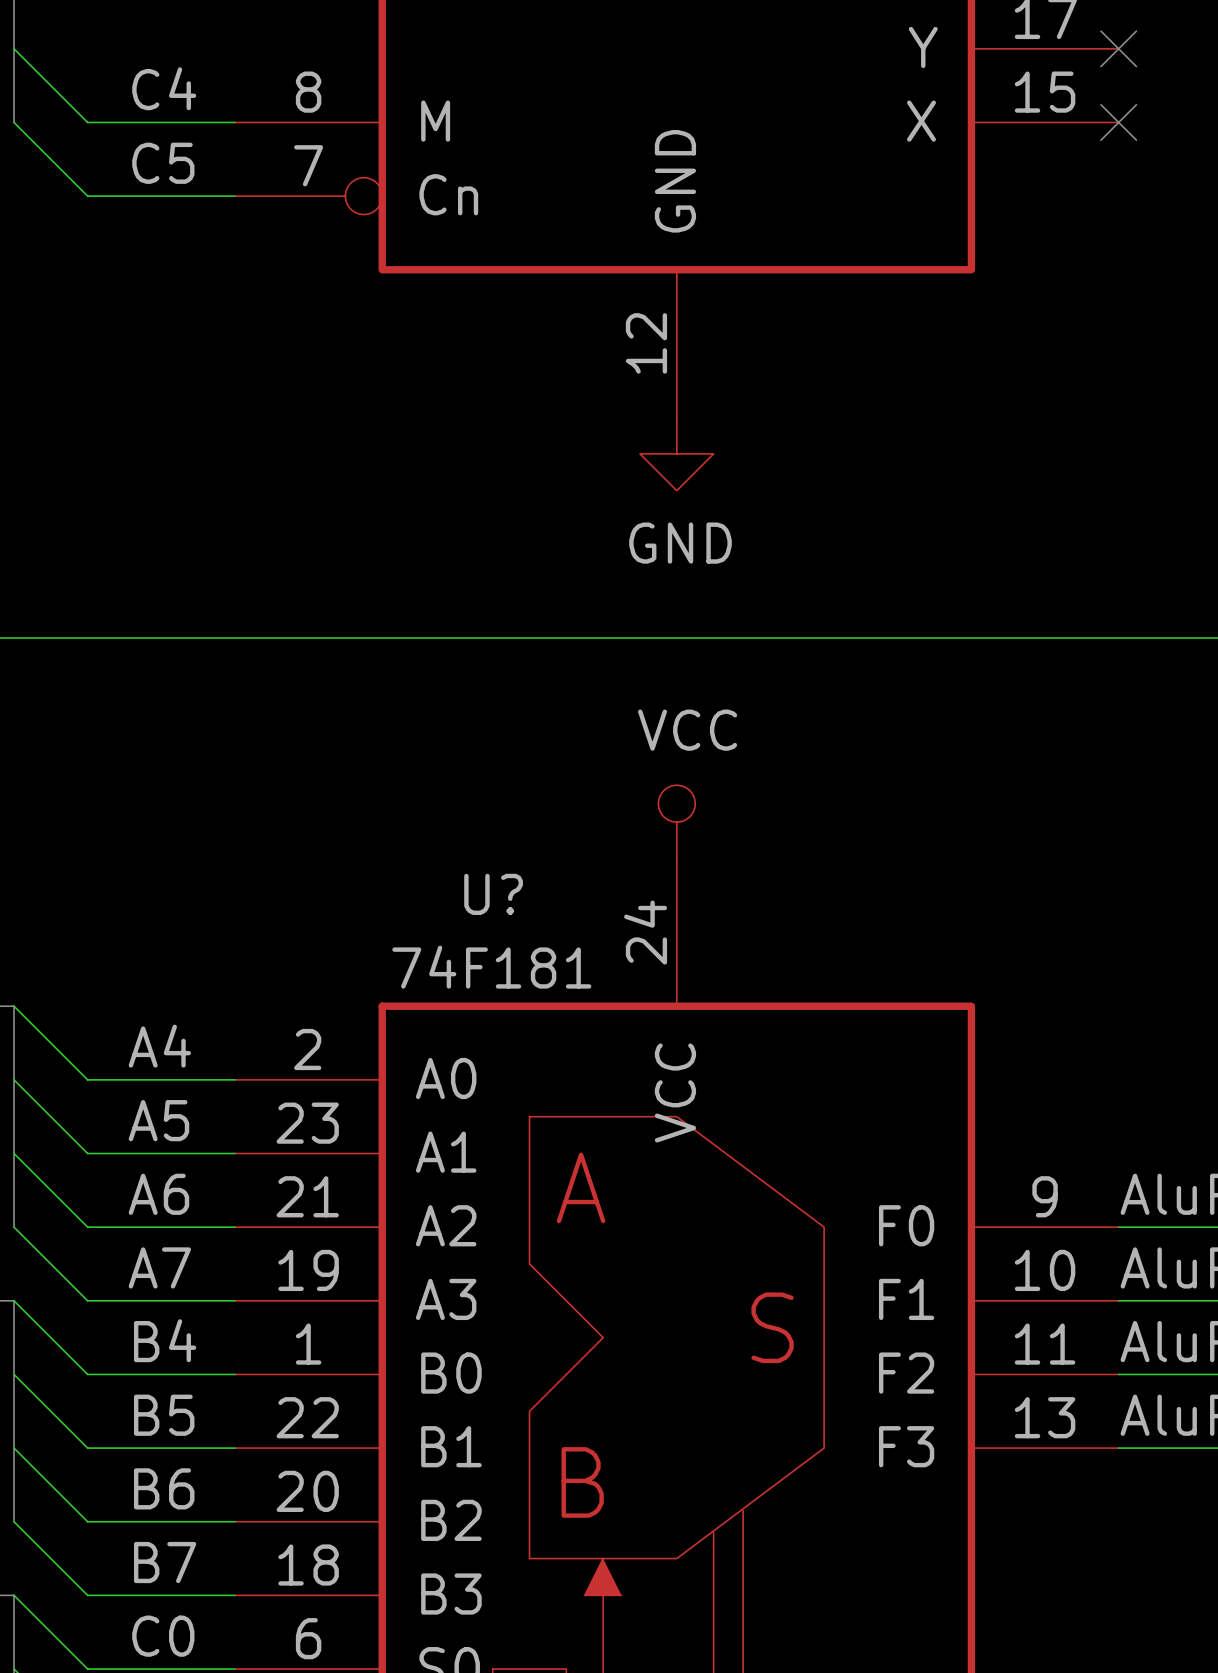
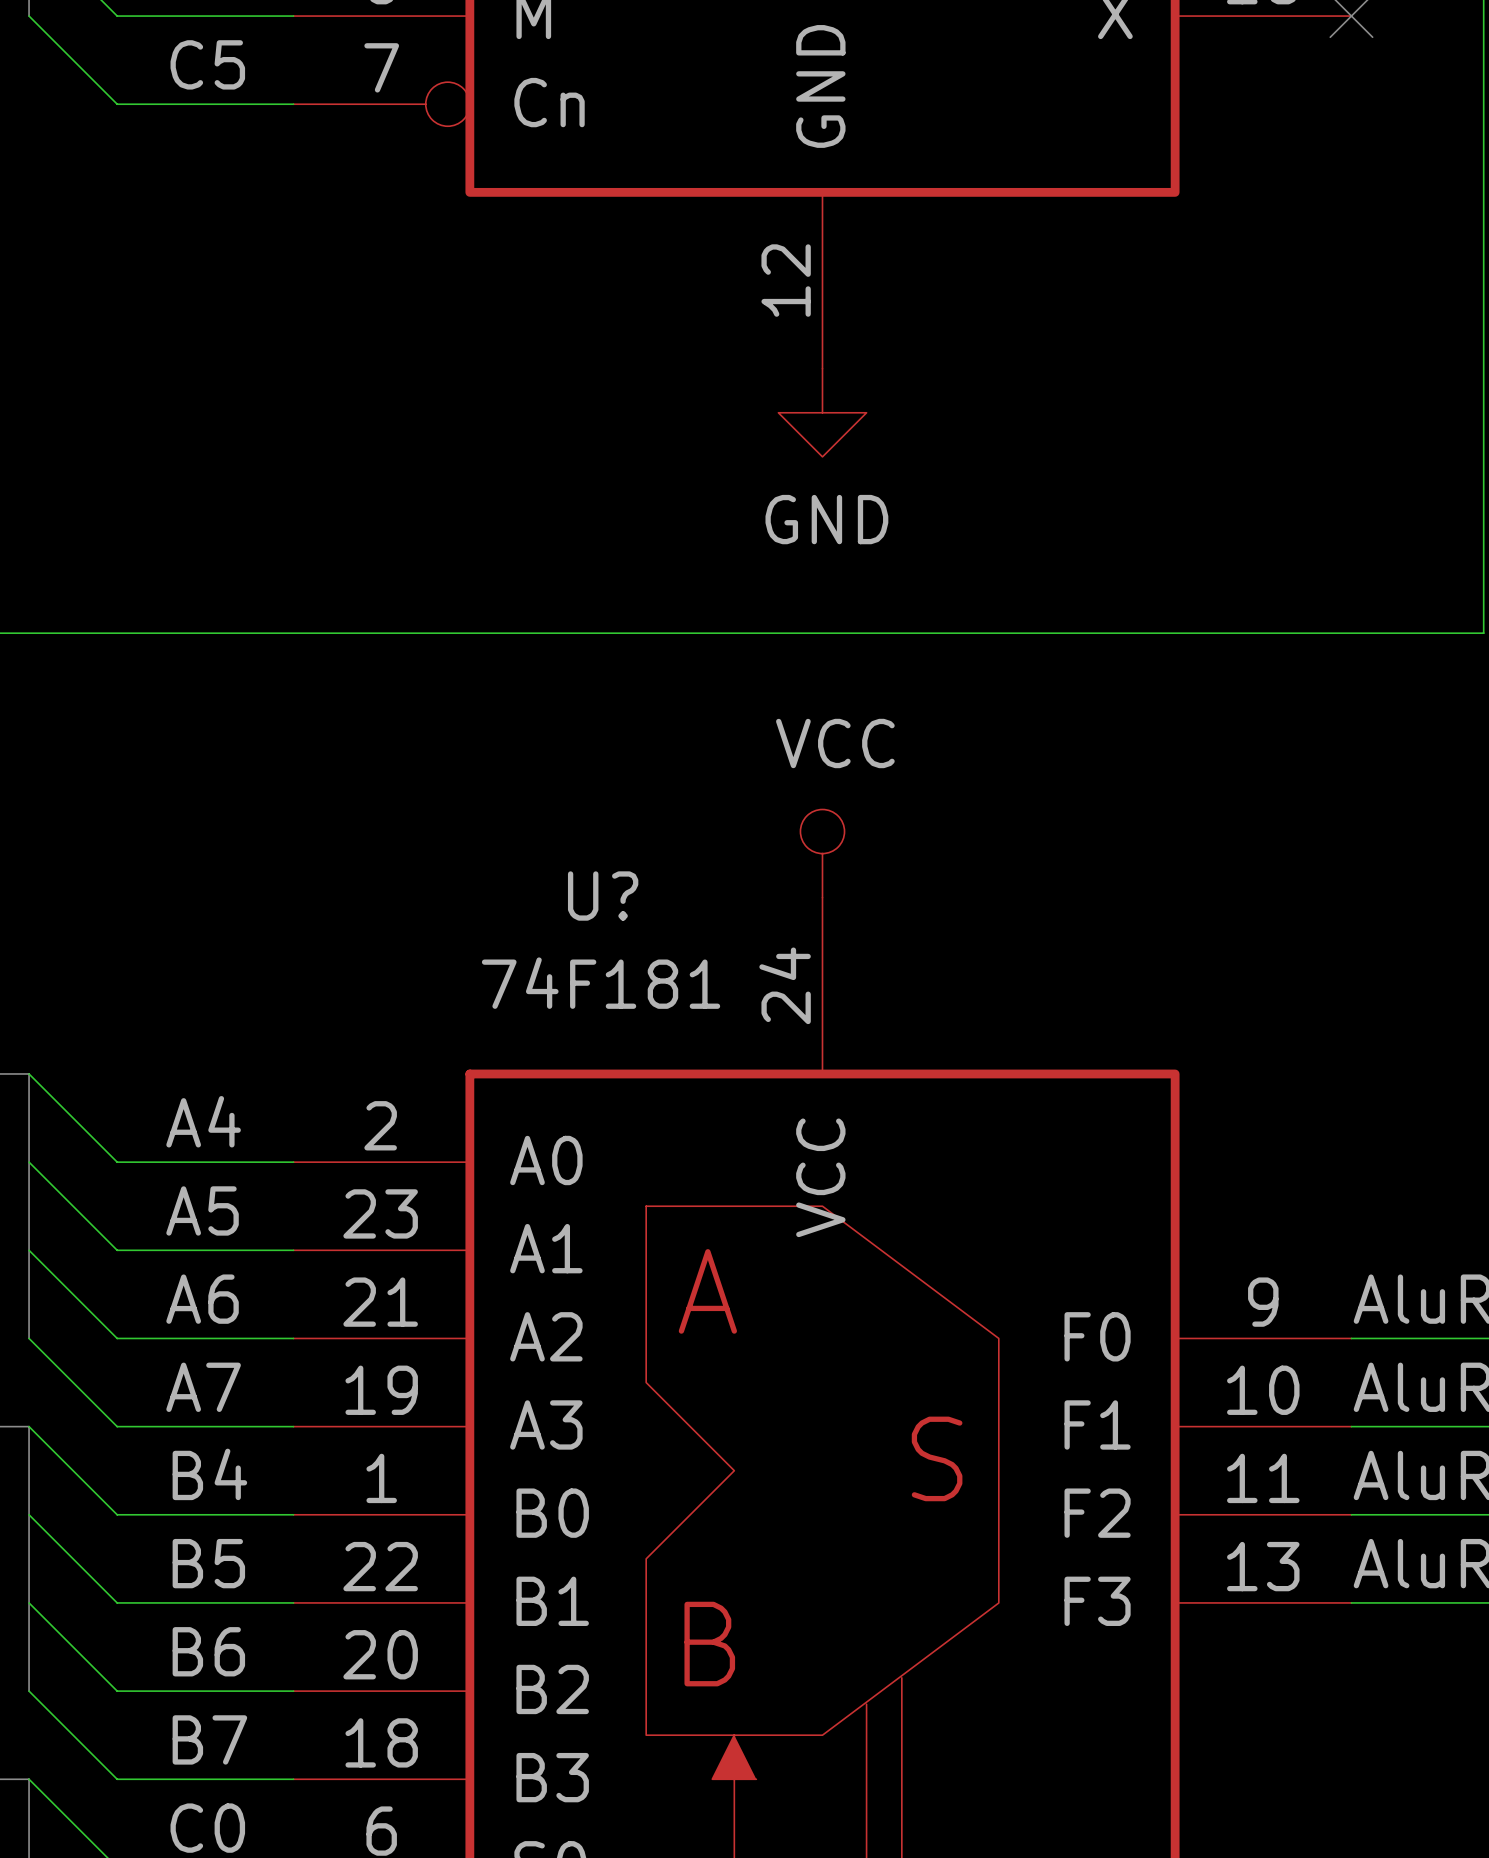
U? name position: U? (493, 894) -> U? (603, 896)
U? value position: 74F181 (491, 967) -> 74F181 (601, 983)

